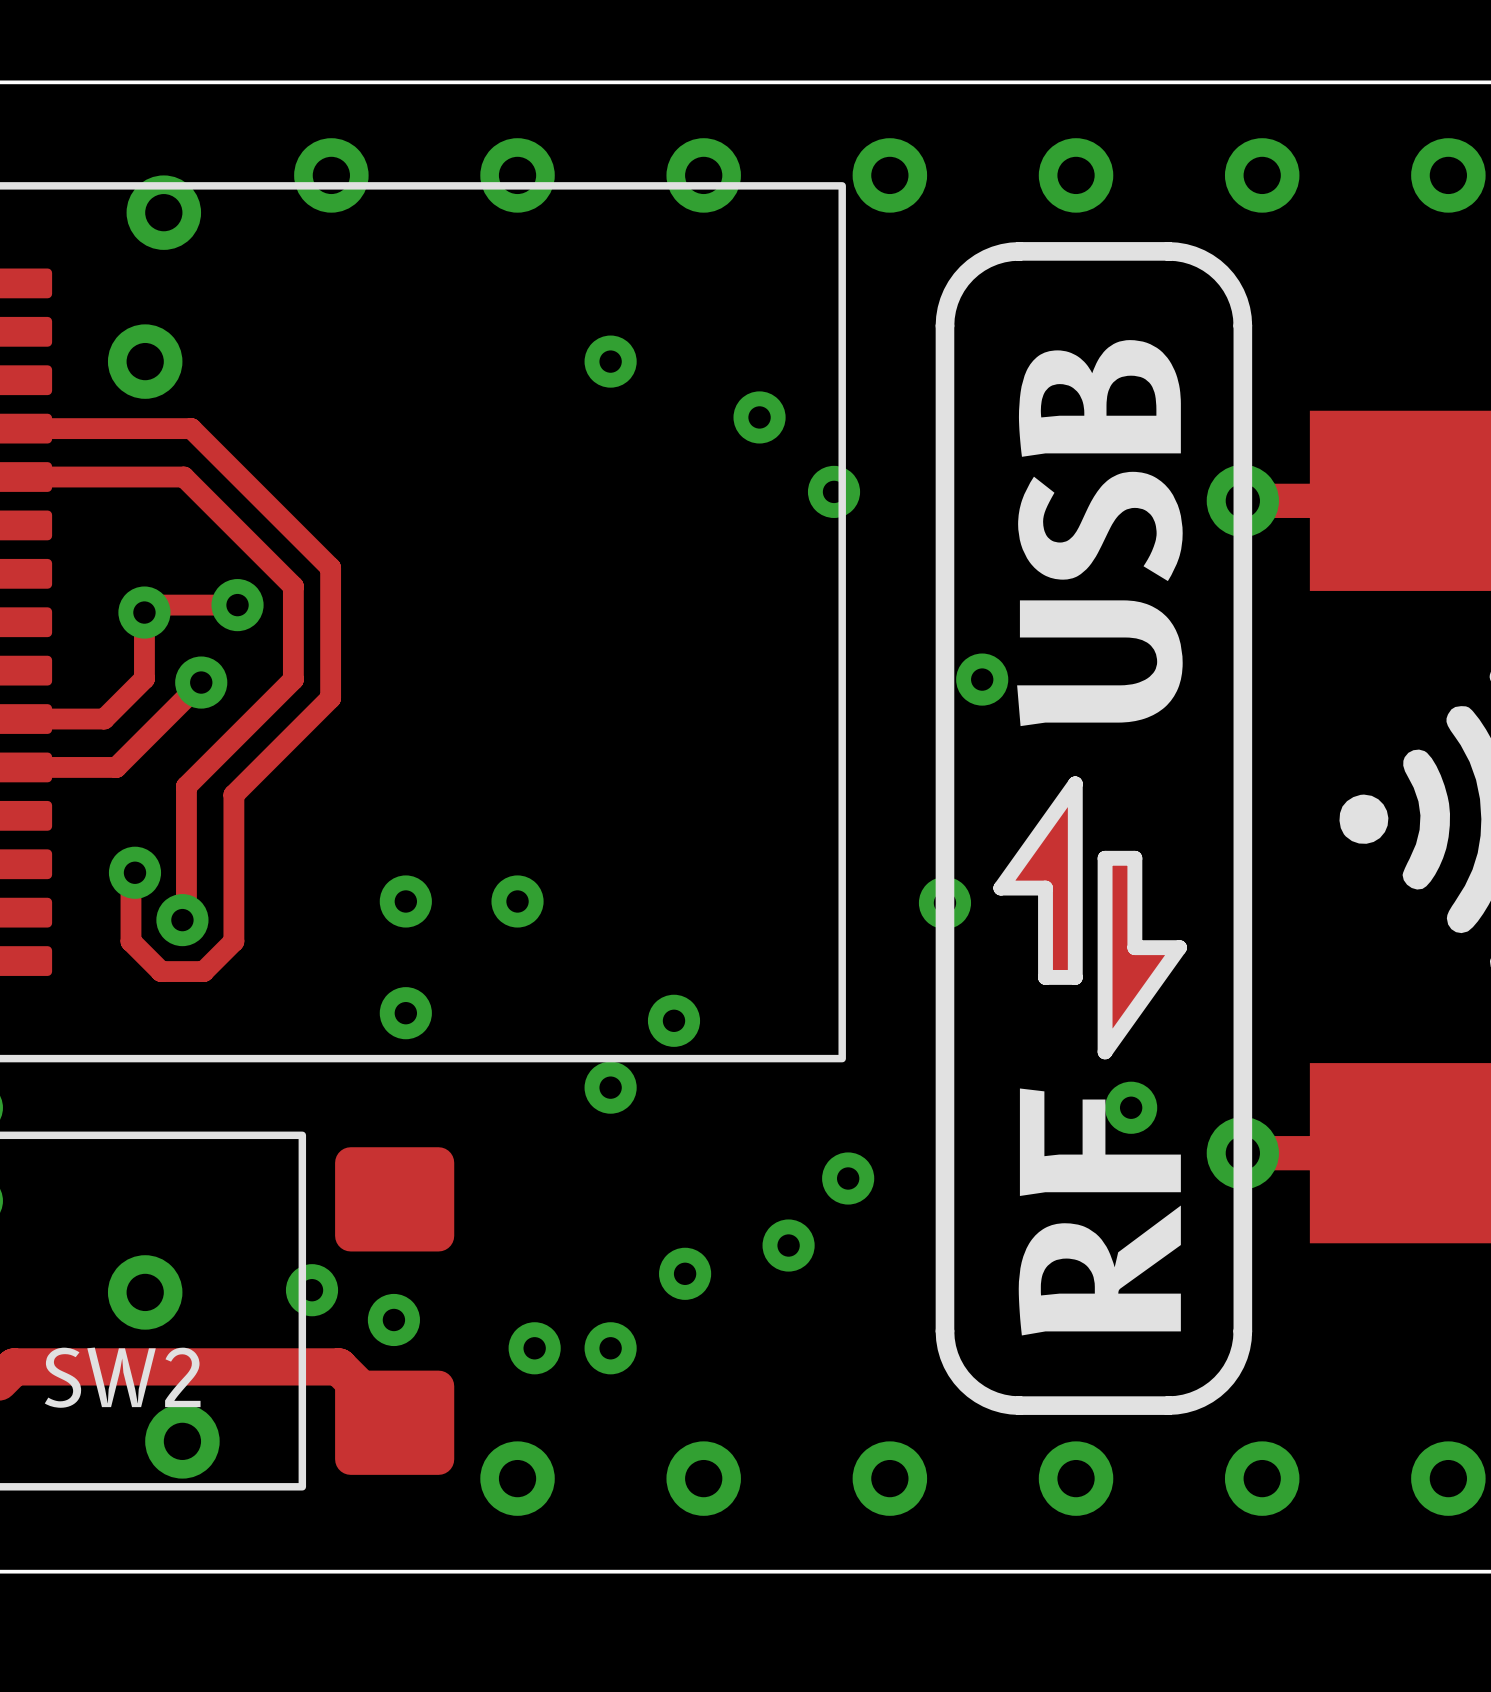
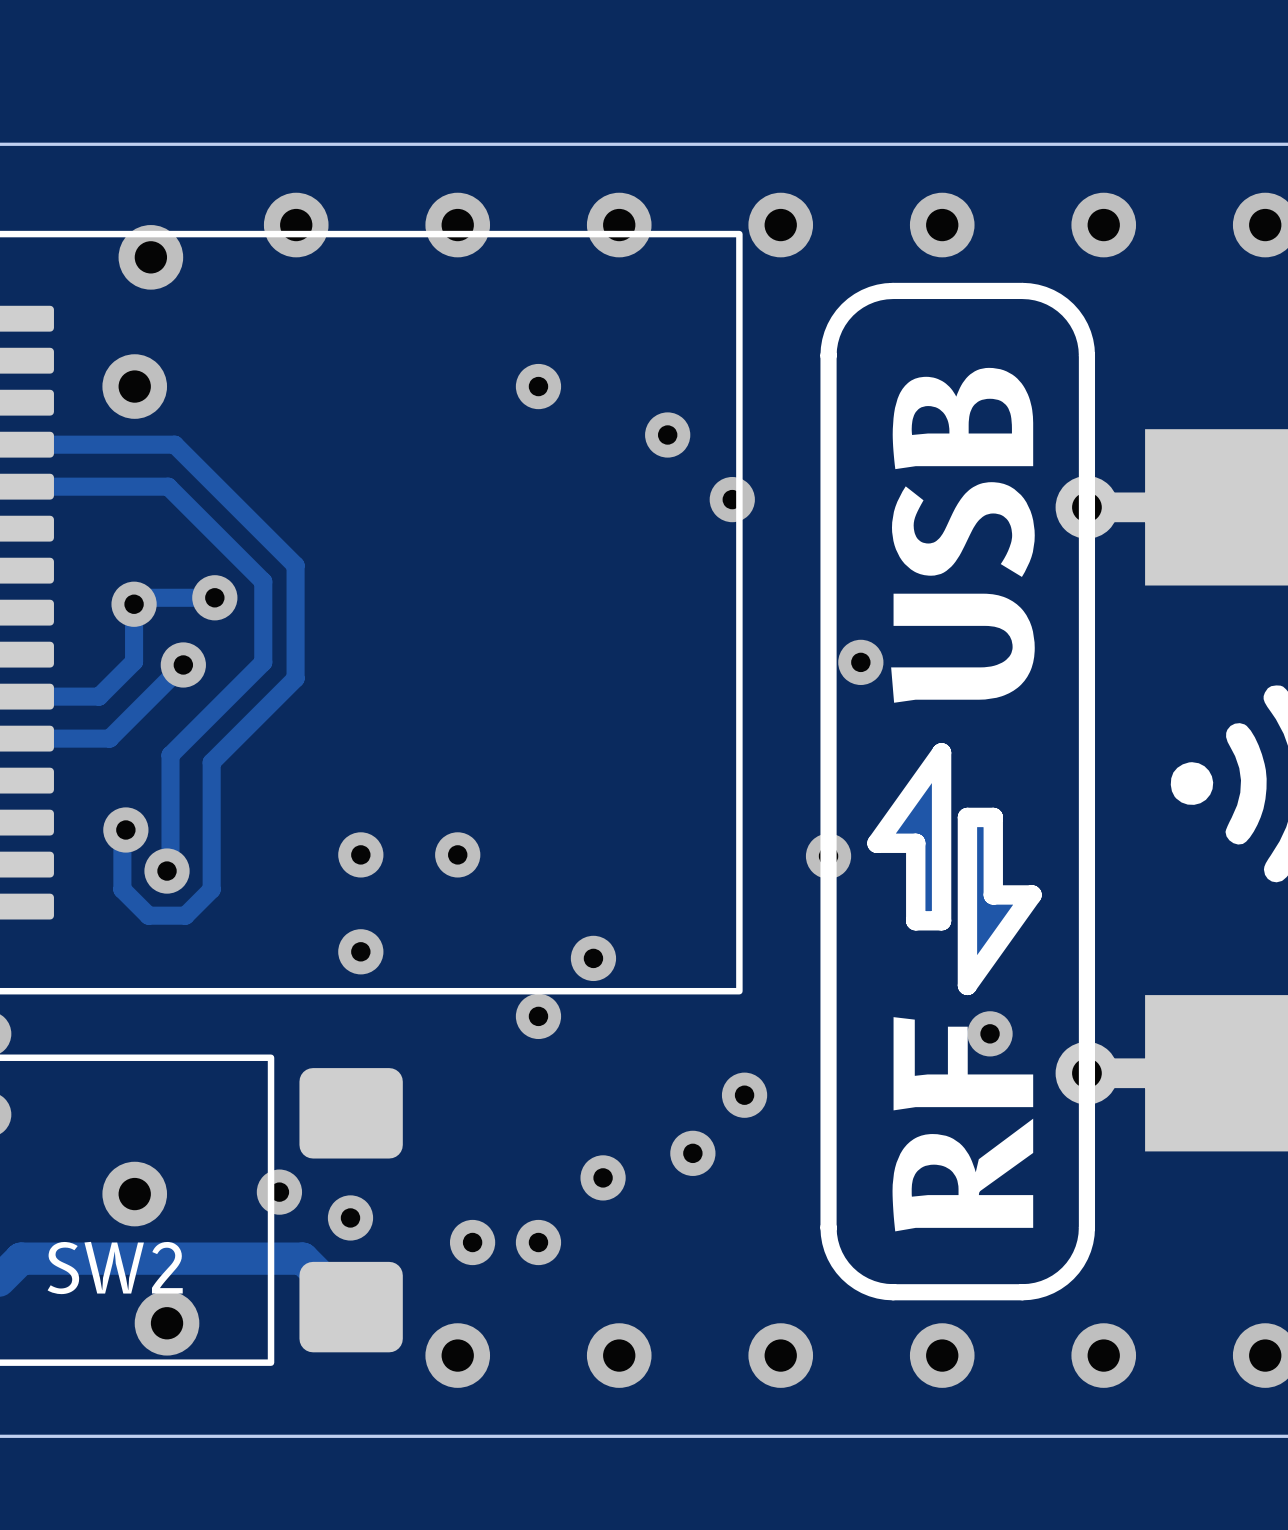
line width: thin (1075, 783) (1000, 888) (1045, 888) (1045, 977) (1075, 977) (1075, 783) -> thick (941, 752) (876, 843) (915, 843) (915, 920) (941, 920) (941, 752)
line width: thin (1105, 858) (1105, 1051) (1179, 947) (1134, 947) (1134, 858) (1105, 858) -> thick (967, 817) (967, 985) (1032, 894) (993, 894) (993, 817) (967, 817)

